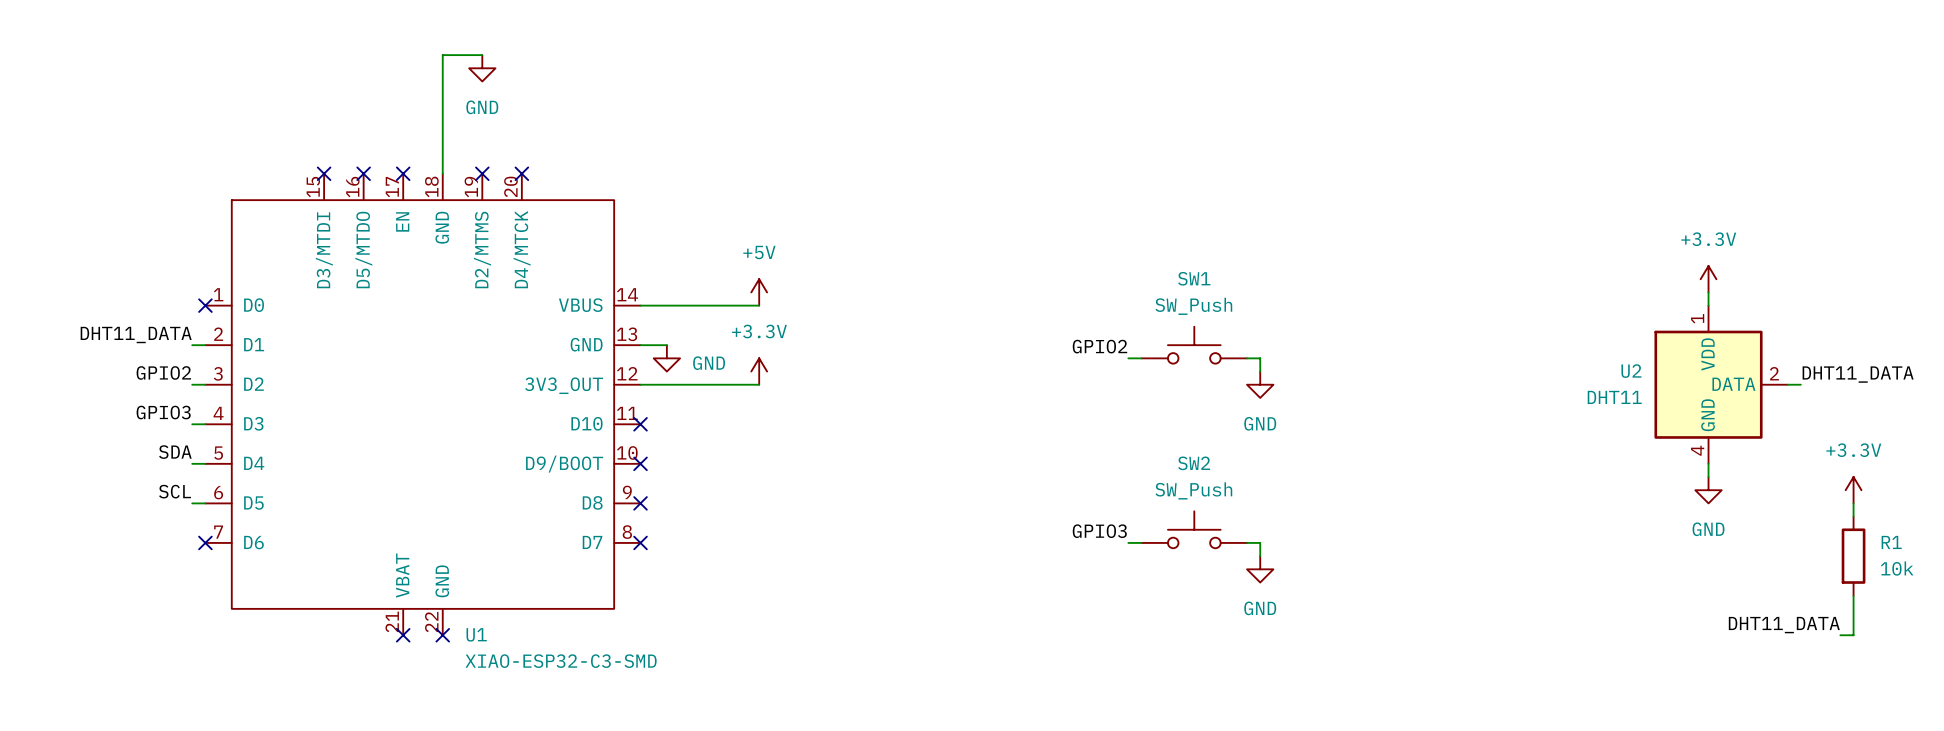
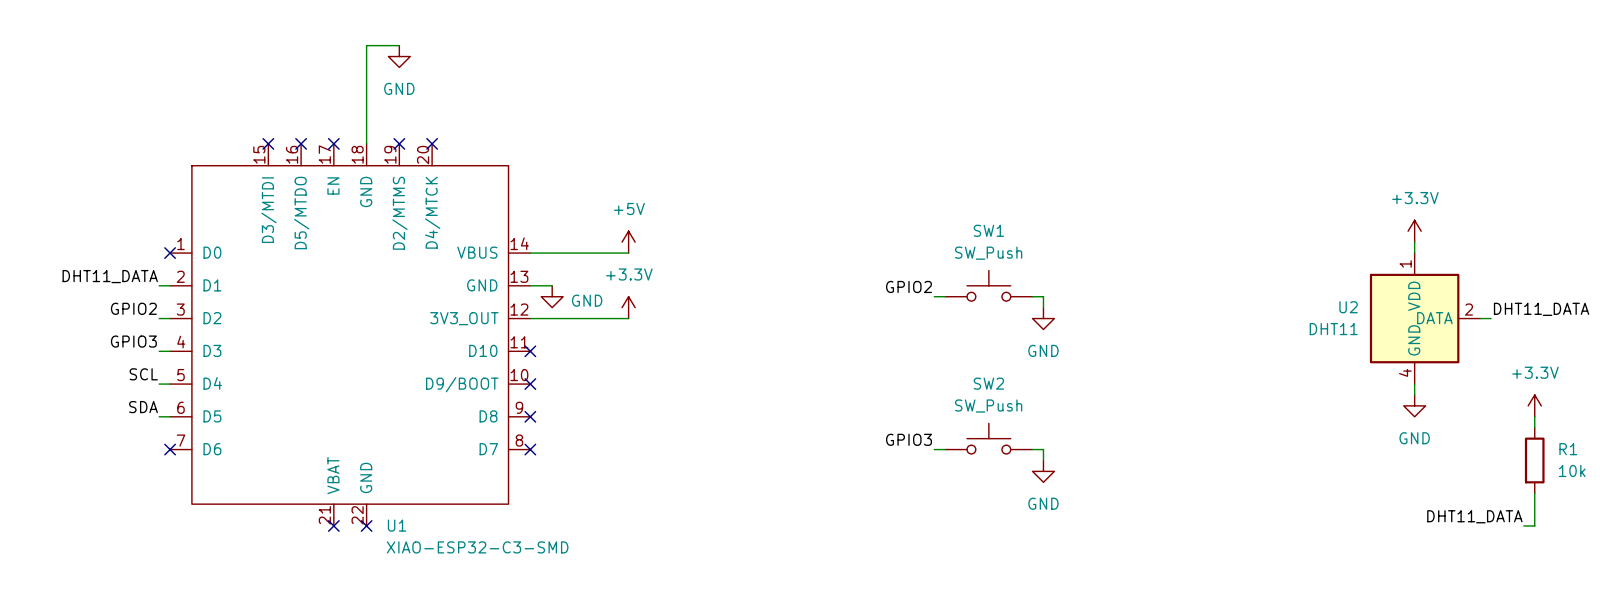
label: SDA (175, 452) -> SCL (143, 374)
label: SCL (175, 491) -> SDA (143, 407)

